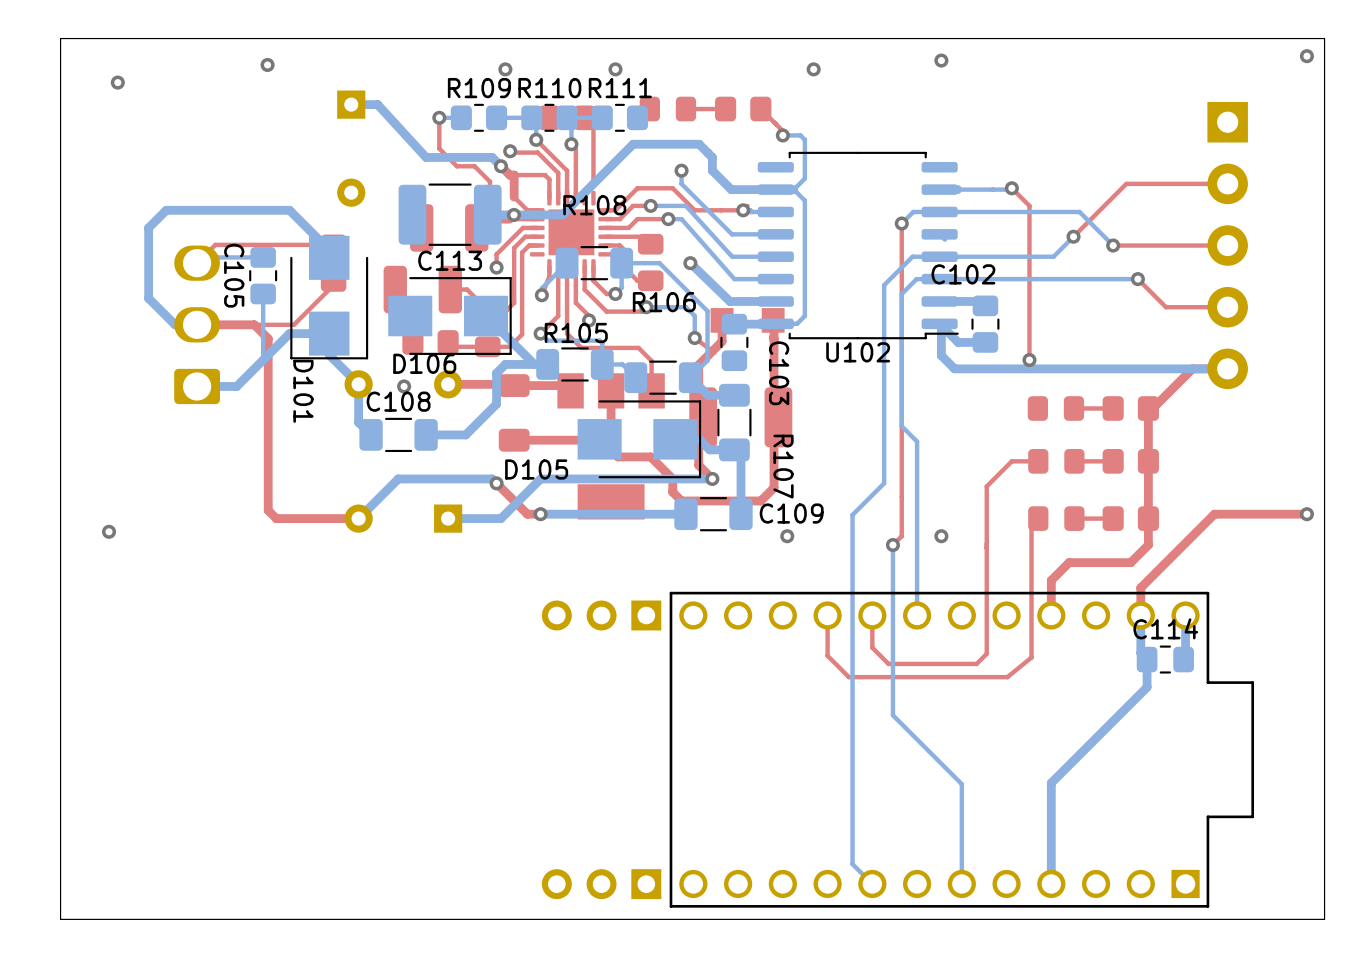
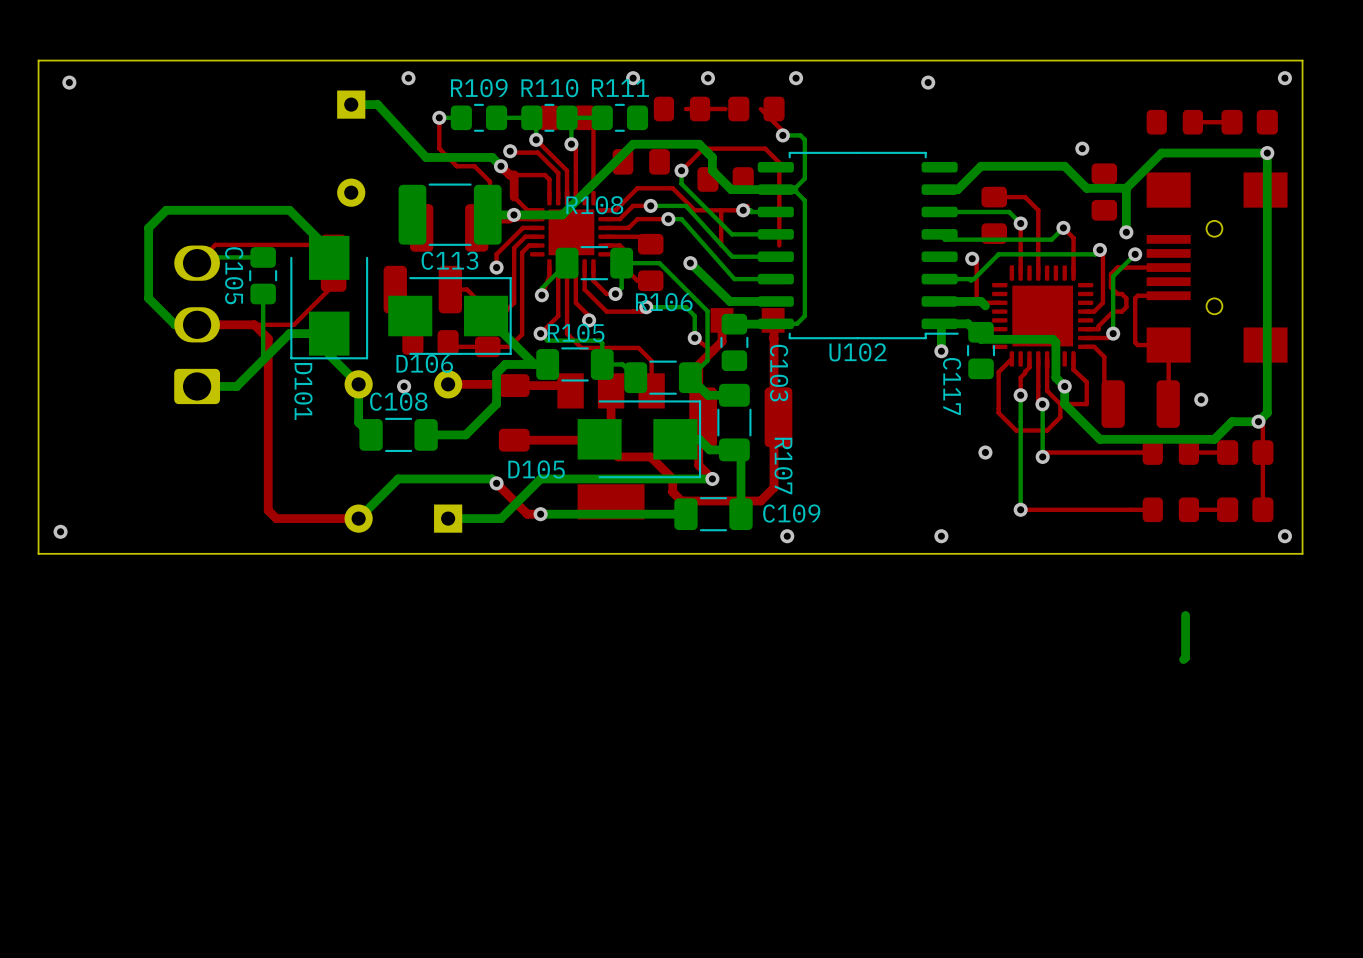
board edge: (1324, 38) (60, 38) (60, 919) (1324, 919) (1324, 38) -> (1302, 60) (1302, 553) (38, 553) (38, 60) (1302, 60)
via position: (1306, 56) -> (1284, 78)
via position: (941, 60) -> (928, 82)
via: (267, 64) -> none
via: (505, 69) -> none
via position: (615, 69) -> (633, 78)
via position: (813, 69) -> (796, 78)
via: none -> (408, 78)
via: none -> (707, 78)
via position: (117, 82) -> (69, 82)
part position: (667, 109) -> (681, 109)
part position: (743, 109) -> (756, 109)
part: none -> (1174, 122)
part: none -> (1249, 122)
via: none -> (1082, 148)
via: none -> (1267, 153)
part: none -> (641, 161)
top track: none -> (681, 170) (703, 148) (765, 148) (779, 162) (779, 245)
part: none -> (725, 179)
top track: (1227, 183) (1126, 183) (1073, 236) -> none
top track: (1011, 188) (1029, 205) (1029, 358) -> none
bottom track: (1011, 188) (939, 189) -> none
via: (1011, 188) -> none
bottom track: none -> (1126, 188) (1126, 232)
bottom track: none -> (1126, 188) (1161, 153) (1267, 153) (1267, 412) (1258, 421) (1232, 421) (1214, 439) (1099, 439) (1064, 404) (1064, 386) (1055, 377) (1055, 342) (1052, 339) (981, 339) (981, 336) (968, 323) (939, 323)
bottom track: none -> (1126, 188) (1086, 188) (1064, 166) (981, 166) (957, 189)
part: none -> (1104, 192)
top track: none -> (994, 197) (1025, 197) (1038, 210) (1038, 273)
top track: none -> (721, 210) (721, 245)
bottom track: (939, 211) (913, 211) (901, 223) -> none
bottom track: (1009, 211) (1079, 211) (1113, 245) -> (1009, 211) (1020, 223)
top track: (901, 223) (901, 536) (892, 545) -> none
via: (901, 223) -> none
top track: none -> (1020, 223) (1020, 273)
via: none -> (1020, 223)
top track: none -> (1063, 227) (1073, 238) (1073, 273)
bottom track: none -> (1063, 227) (1051, 239) (944, 239)
via: none -> (1126, 232)
bottom track: (1073, 236) (1053, 256) (912, 256) (884, 285) (884, 483) (852, 514) (852, 864) (872, 883) -> none
via position: (1073, 236) -> (1063, 227)
via: (1113, 245) -> none
top track: (1227, 245) (1113, 245) -> none
part: (1227, 245) -> none
top track: none -> (1099, 249) (1102, 252) (1102, 302) (1094, 311) (1085, 311)
via: none -> (1099, 249)
bottom track: none -> (1135, 254) (1113, 276) (1113, 333)
via: none -> (1135, 254)
top track: none -> (972, 258) (976, 263) (976, 298) (981, 302) (999, 302)
via: none -> (972, 258)
top track: none -> (1168, 267) (1117, 267) (1110, 274) (1110, 287) (1117, 293) (1121, 293) (1126, 298) (1126, 307) (1121, 311) (1113, 311) (1098, 326) (1098, 329) (1085, 329)
part: none -> (1217, 267)
bottom track: (939, 279) (916, 279) (901, 293) (901, 426) (917, 441) (917, 615) -> none
top track: (1137, 279) (1166, 307) (1227, 307) -> none
bottom track: (1137, 279) (973, 279) -> (1099, 249) (1095, 254) (998, 254) (973, 279)
via: (1137, 279) -> none
top track: none -> (1168, 295) (1137, 295) (1135, 298) (1135, 342) (1137, 345) (1168, 345) (1168, 404)
part: none -> (1042, 316)
C102 side: bottom (985, 324) -> top (994, 215)
bottom track: (941, 325) (958, 342) (985, 342) -> none
top track: none -> (1113, 333) (1108, 338) (1085, 338)
via: none -> (1113, 333)
top track: none -> (1085, 346) (1094, 346) (1104, 357) (1104, 382)
C117: none -> (981, 350)
bottom track: (941, 351) (941, 355) (954, 368) (1227, 368) -> none
via: none -> (941, 351)
top track: none -> (1011, 358) (998, 372) (998, 412) (1016, 430) (1047, 430) (1060, 417) (1060, 404)
top track: none -> (1038, 358) (1038, 399) (1042, 404)
top track: none -> (1047, 358) (1047, 390) (1060, 404)
top track: none -> (1073, 358) (1073, 369) (1086, 382) (1086, 404) (1060, 404)
top track: none -> (1029, 360) (1029, 367) (1020, 377) (1020, 395)
via: (1029, 360) -> none
top track: (1227, 368) (1192, 368) (1148, 412) (1148, 545) (1130, 562) (1069, 562) (1051, 580) (1051, 615) -> none
via: none -> (1064, 386)
bottom track: none -> (1020, 395) (1020, 509)
via: none -> (1020, 395)
part footprint: [1102, 396, 1159, 421] -> [1101, 380, 1180, 428]
via: none -> (1201, 399)
bottom track: none -> (1042, 404) (1042, 456)
via: none -> (1042, 404)
part: (1055, 408) -> none
top track: (1113, 408) (1073, 408) -> (1232, 122) (1192, 122)
top track: none -> (1258, 421) (1262, 426) (1262, 509)
via: none -> (1258, 421)
via: none -> (985, 452)
top track: none -> (1152, 452) (1042, 452) (1042, 456)
part: none -> (1170, 452)
part: none -> (1245, 452)
via: none -> (1042, 456)
top track: (1038, 461) (1011, 461) (986, 486) (986, 653) (976, 663) (888, 663) (872, 647) (872, 615) -> none
part: (1056, 461) -> none
top track: (1113, 461) (1074, 461) -> (1227, 452) (1188, 452)
part: (1130, 461) -> none
via: none -> (1020, 509)
top track: none -> (1152, 509) (1020, 509)
part: none -> (1170, 509)
part: none -> (1245, 509)
top track: (1306, 514) (1214, 514) (1140, 587) (1140, 615) -> none
via position: (1306, 514) -> (1284, 536)
top track: (1038, 518) (1031, 525) (1031, 657) (1007, 677) (848, 677) (827, 655) (827, 615) -> none
part: (1056, 518) -> none
top track: (1113, 518) (1074, 518) -> (1227, 509) (1188, 509)
part: (1130, 518) -> none
via position: (109, 531) -> (60, 531)
bottom track: (892, 545) (892, 715) (961, 784) (961, 883) -> none
via: (892, 545) -> none
part: (601, 615) -> none
bottom track: (1140, 615) (1140, 653) (1147, 659) (1147, 687) (1051, 783) (1051, 883) -> none
C114: (1165, 659) -> none
part: (961, 749) -> none
part: (601, 884) -> none

